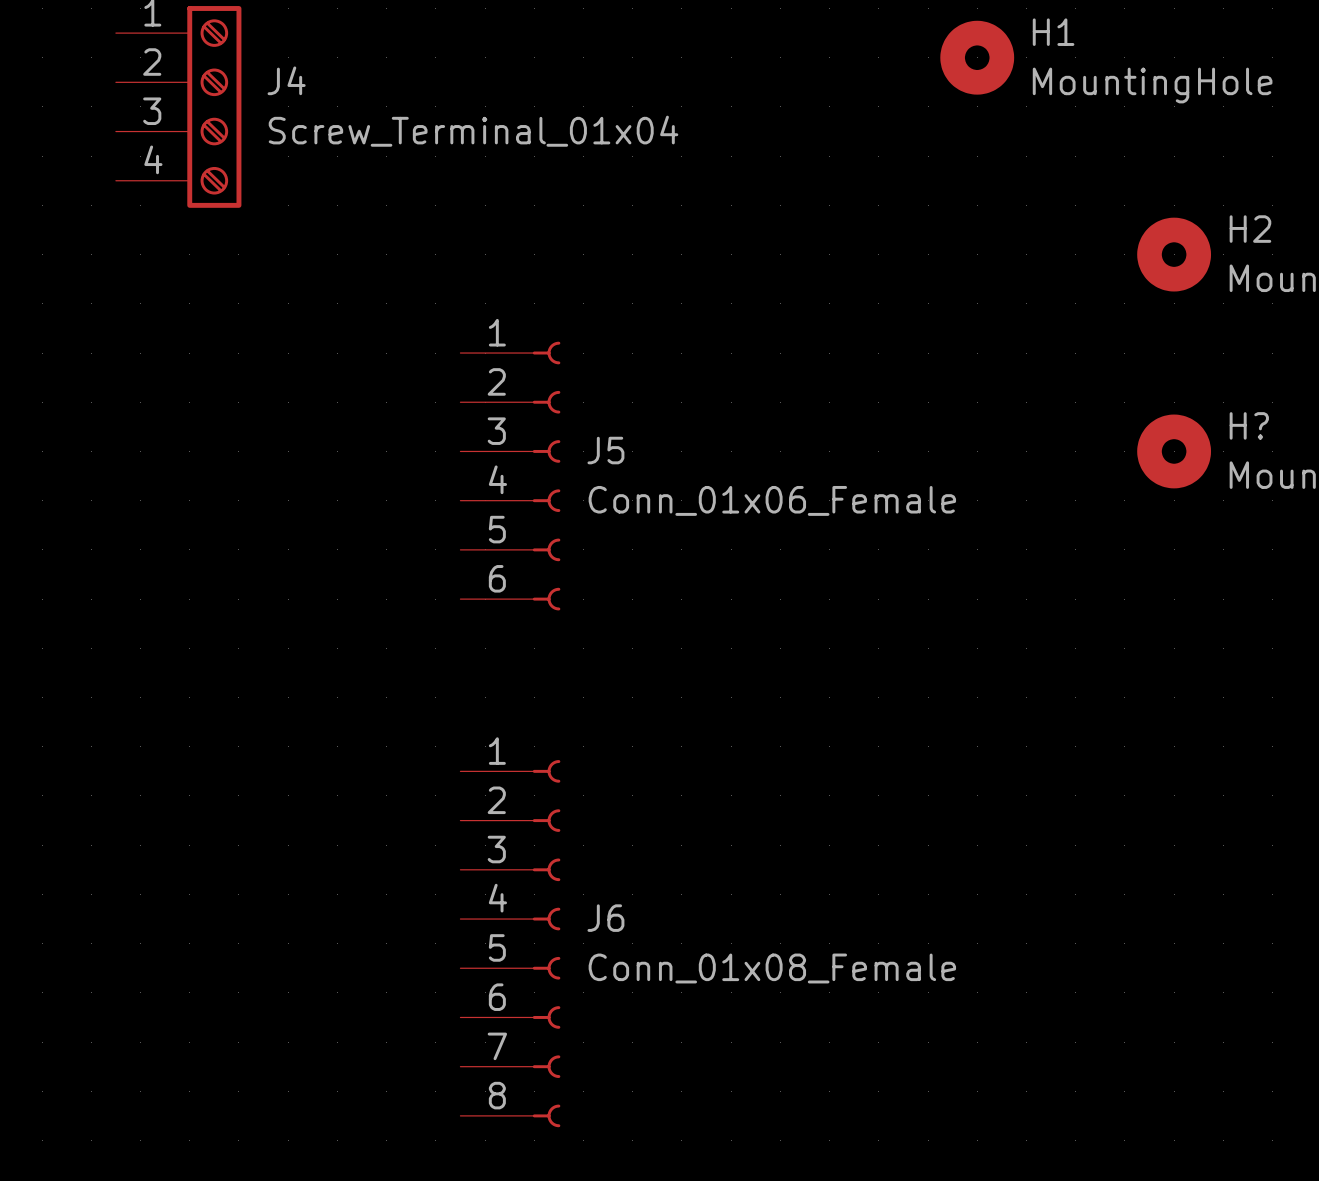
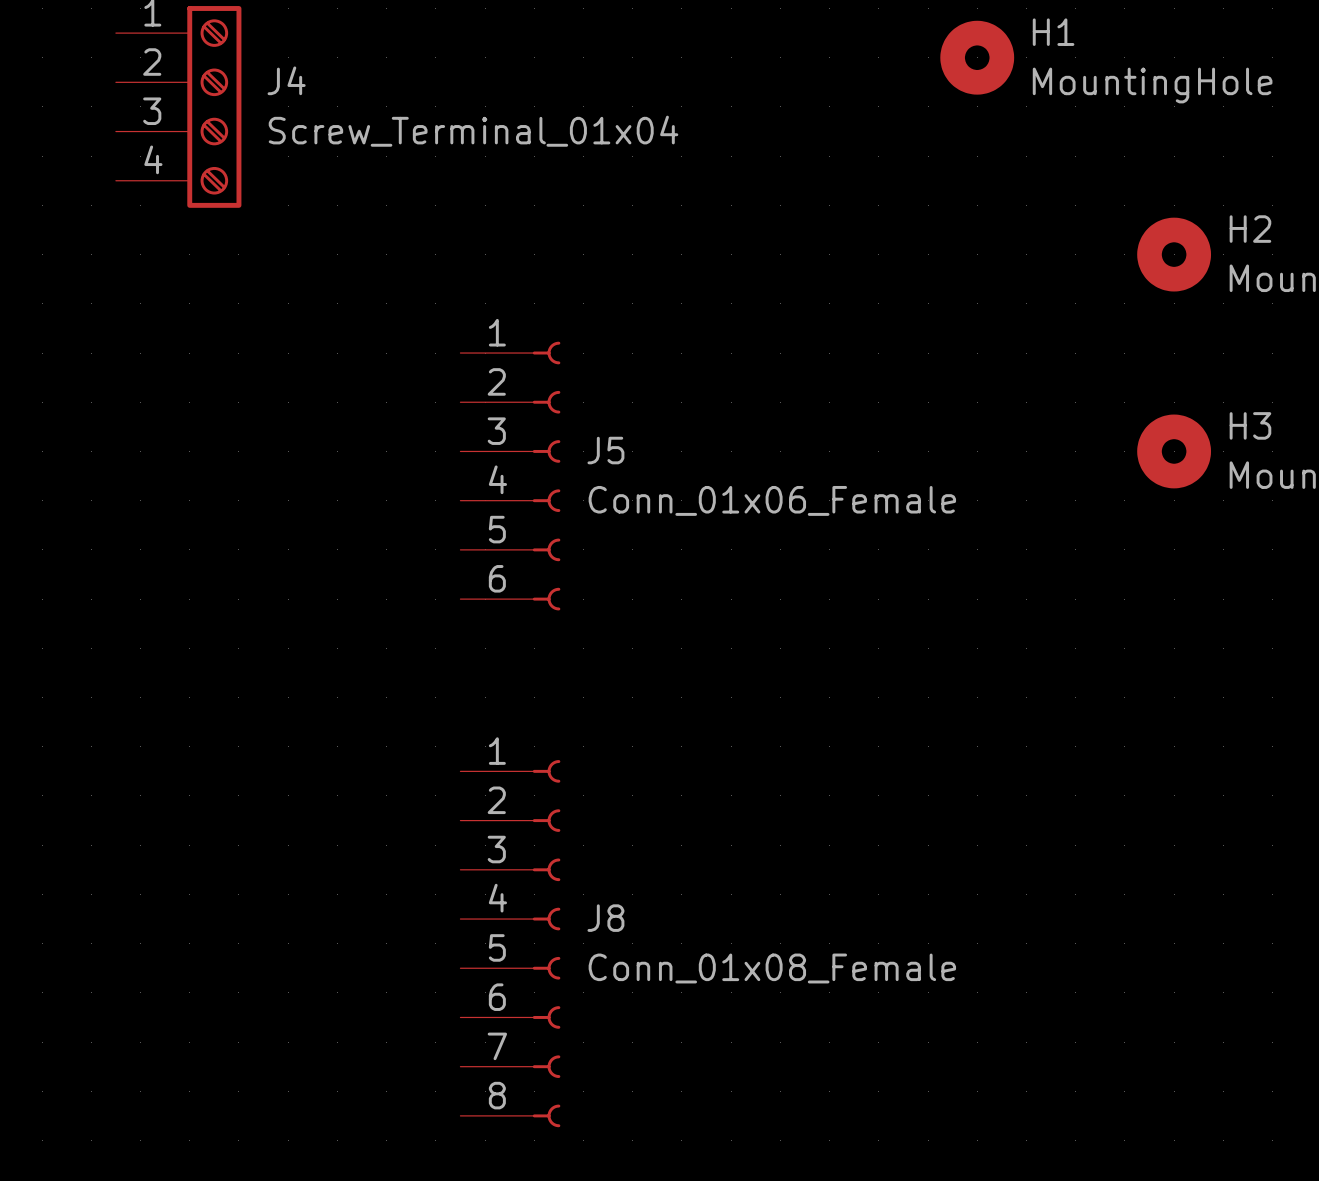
H? name: H? (1249, 425) -> H3 (1250, 425)
J6 name: J6 (605, 918) -> J8 (605, 918)

